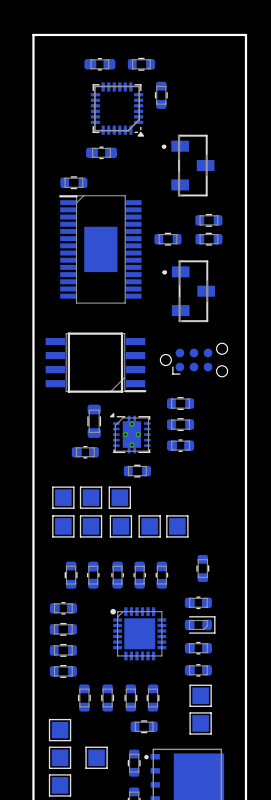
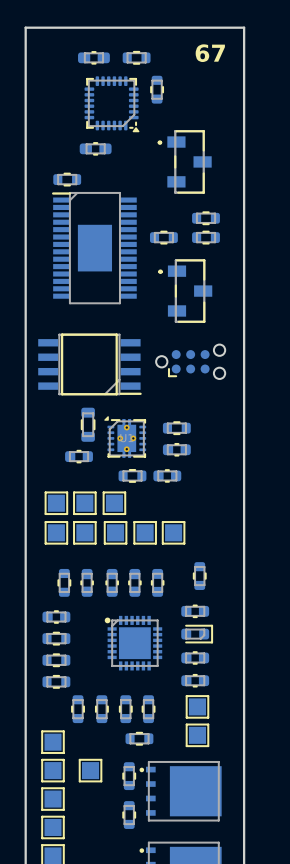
text: none -> 67 (210, 53)
part: (180, 403) -> none
part: (130, 433) -> none
part: none -> (125, 436)
part: none -> (167, 475)

